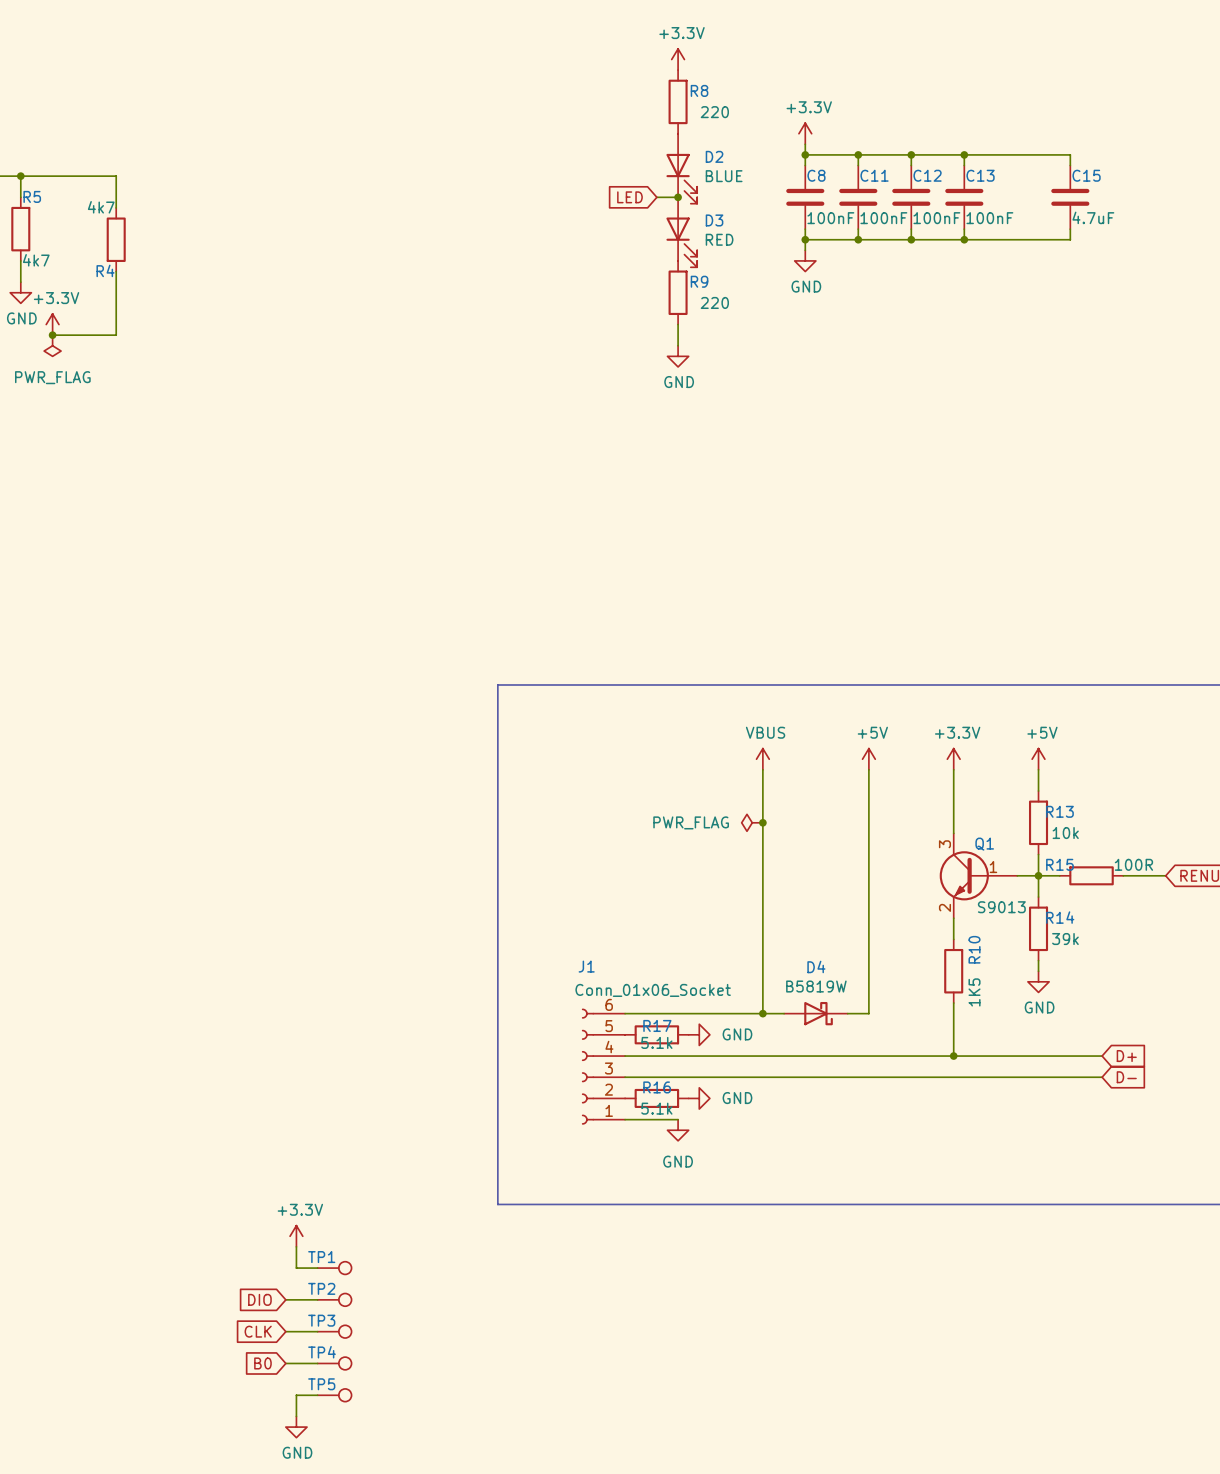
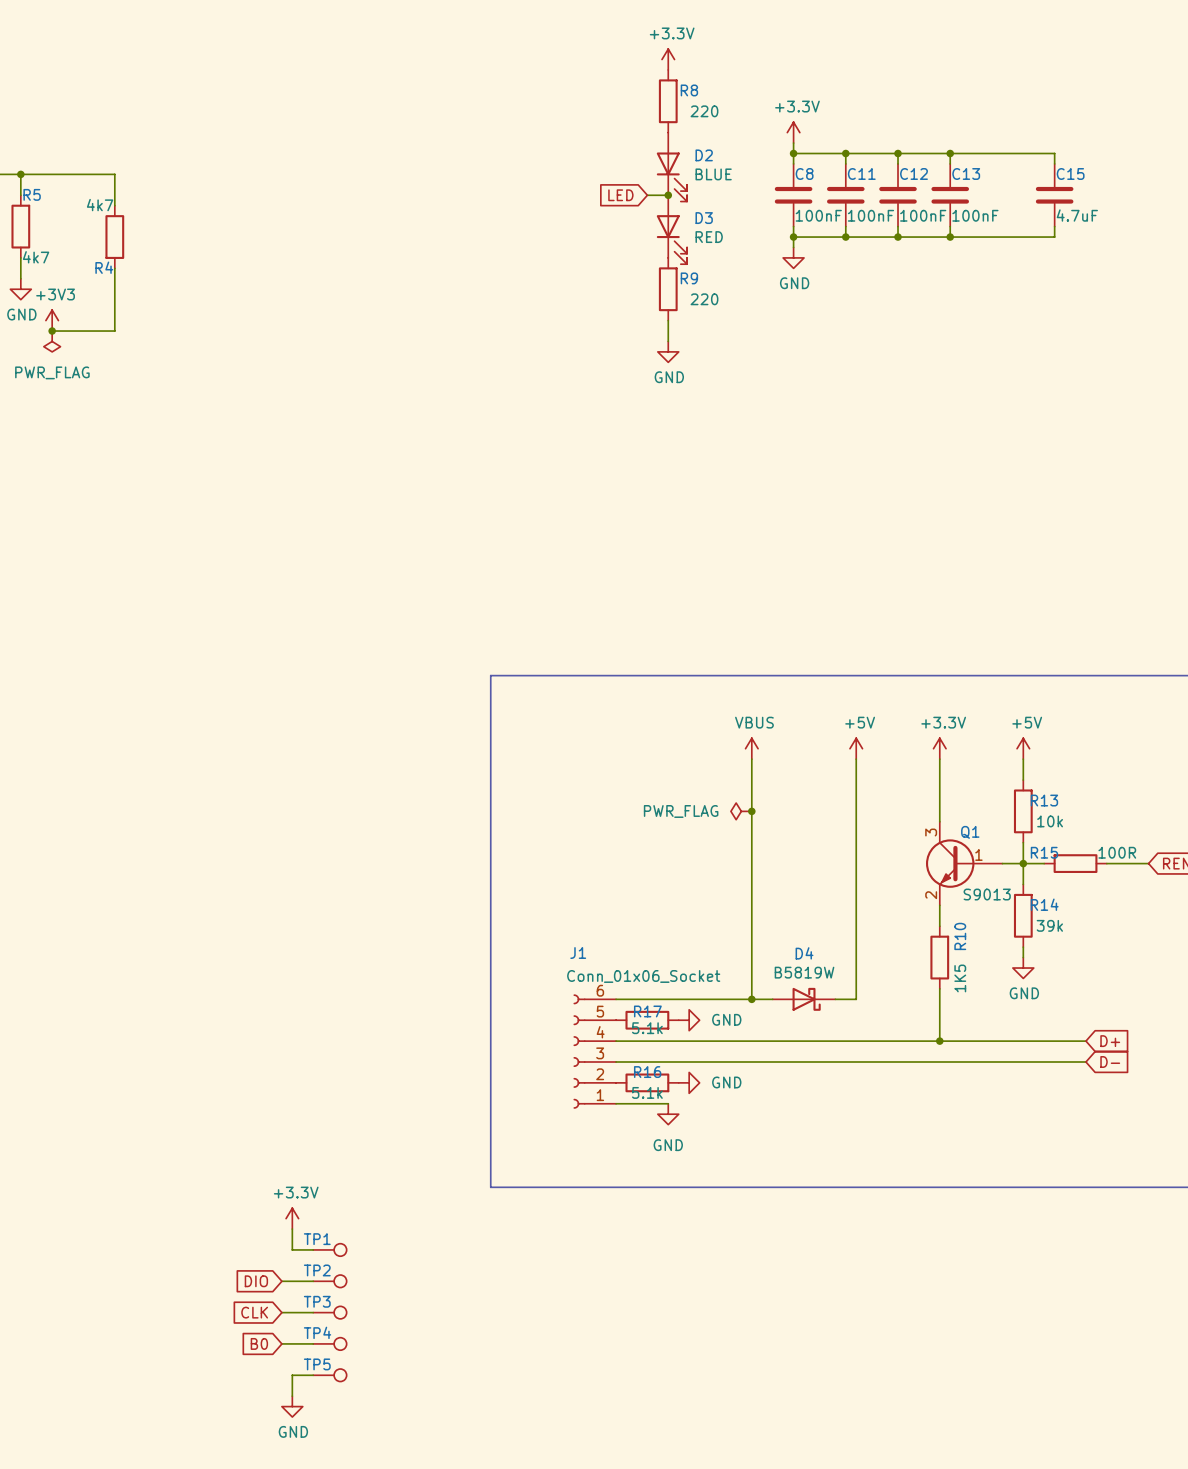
power symbol: +3.3V (52, 324) -> +3V3 (52, 320)

